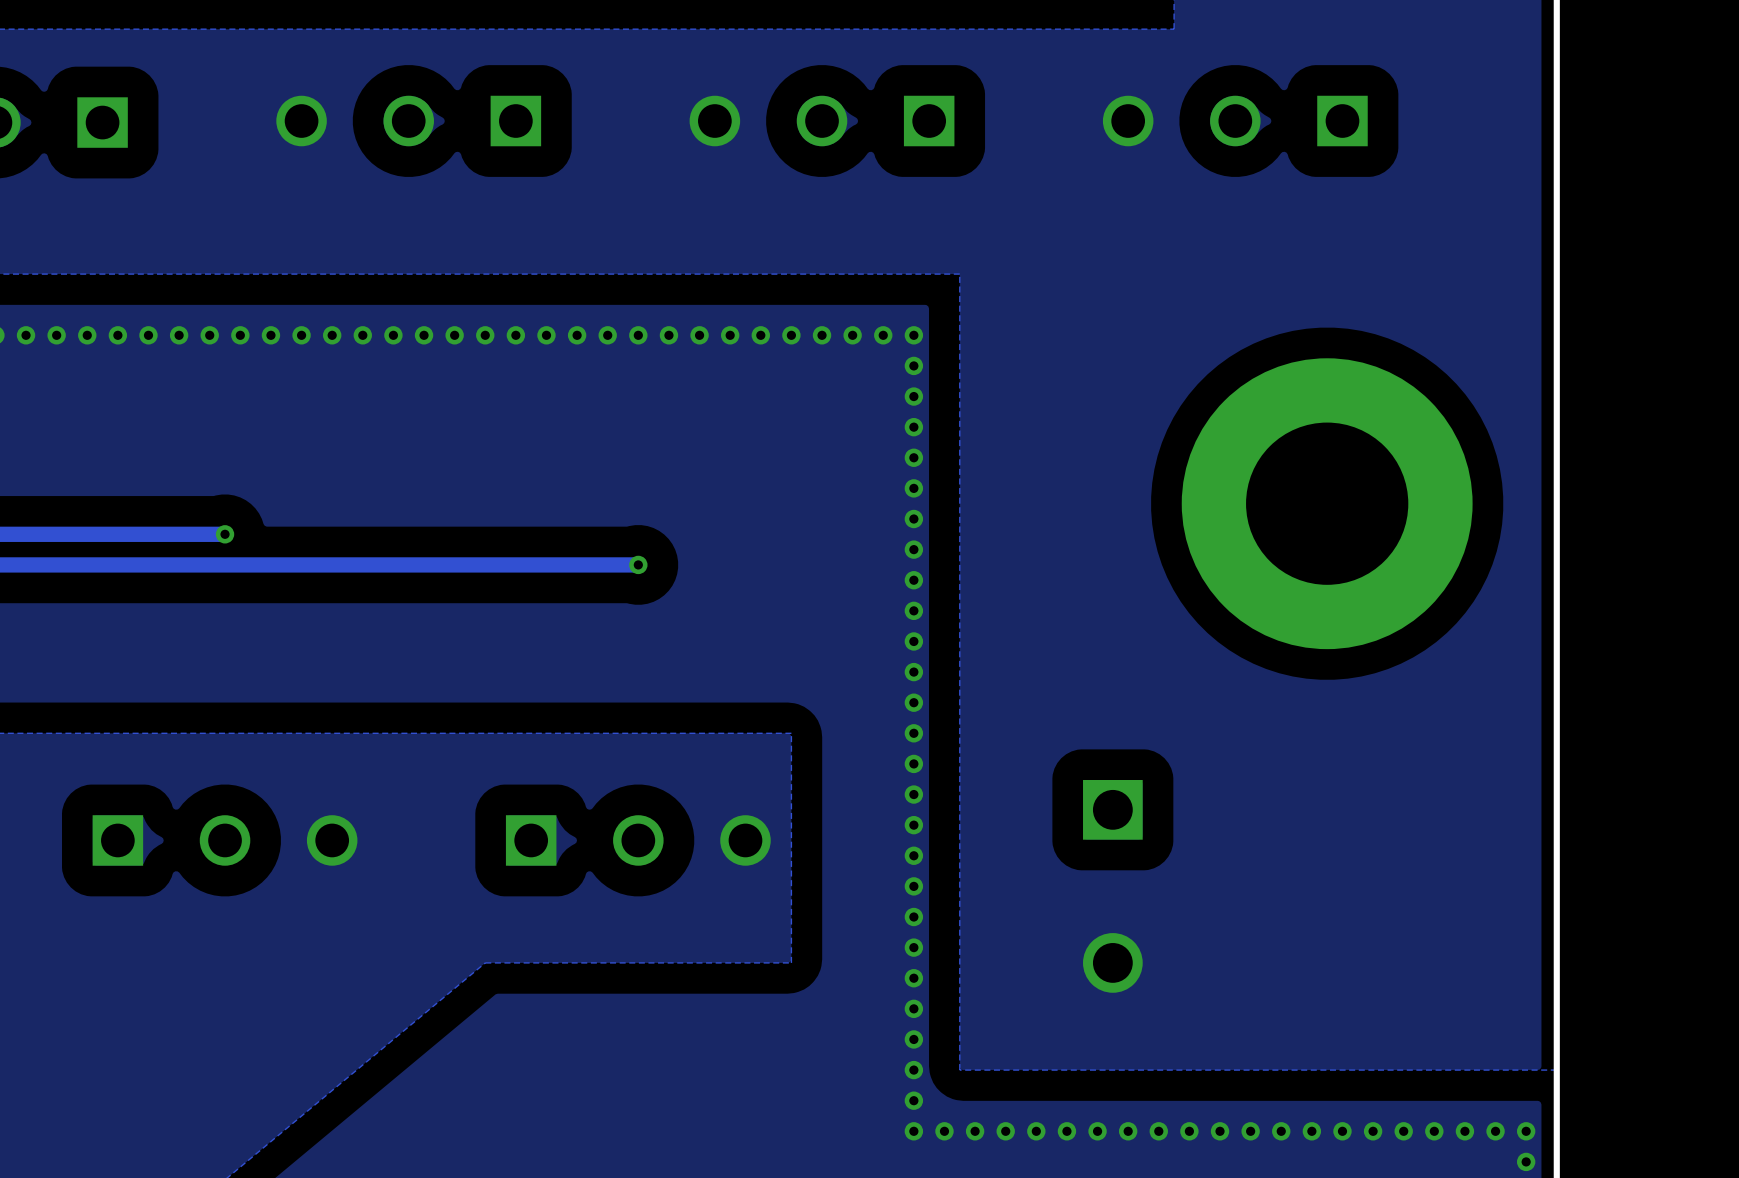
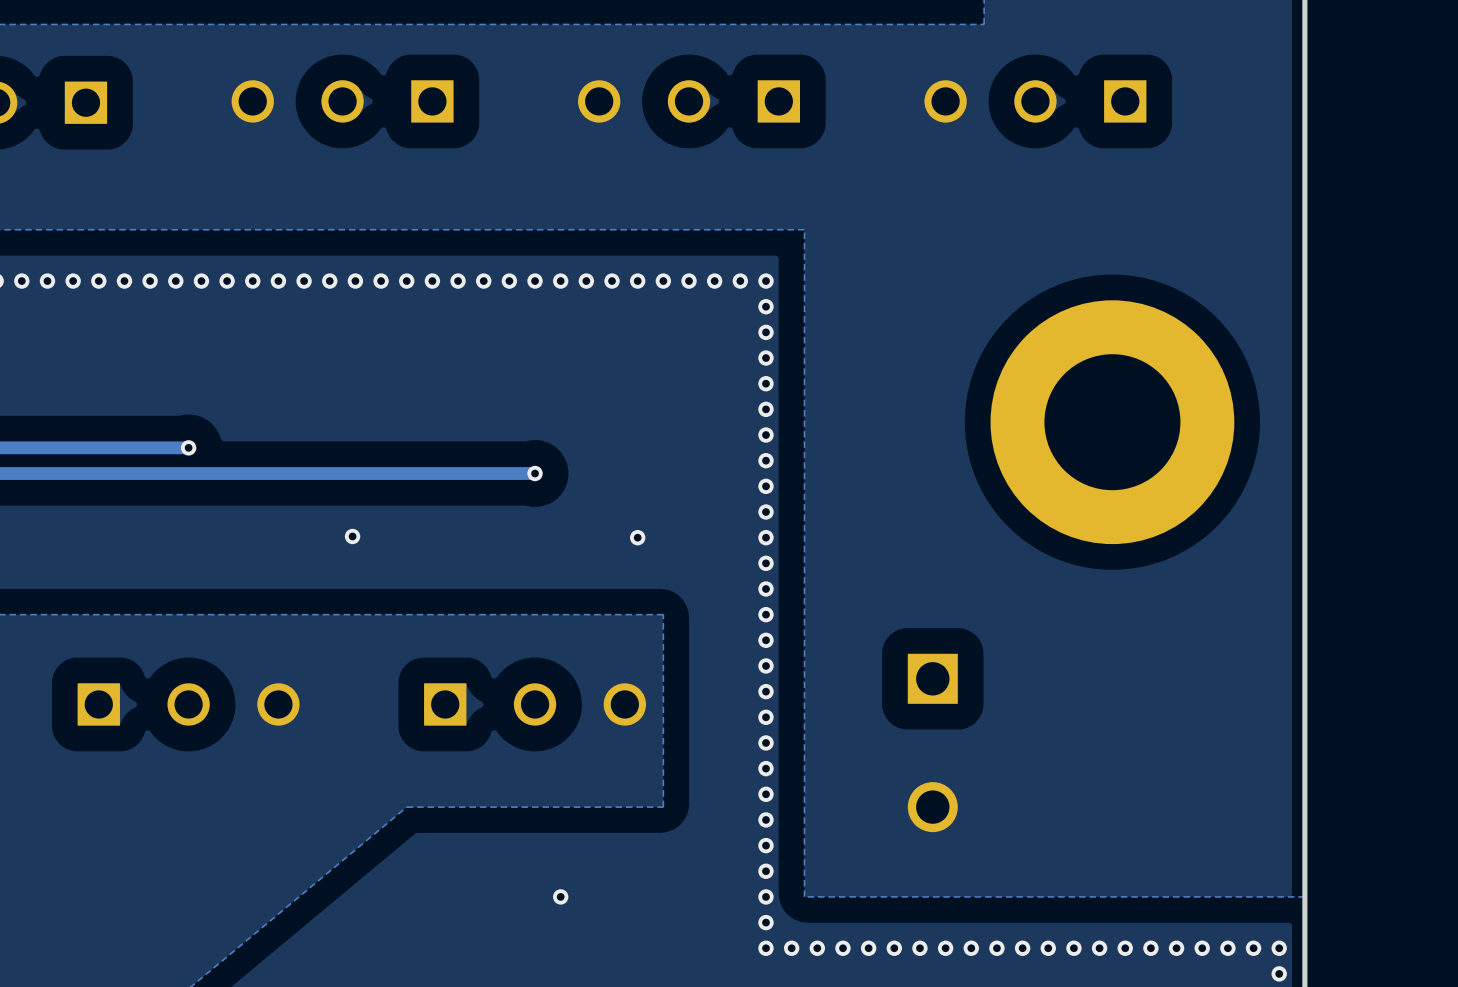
via: none -> (352, 536)
via: none -> (637, 537)
via: none -> (560, 896)

